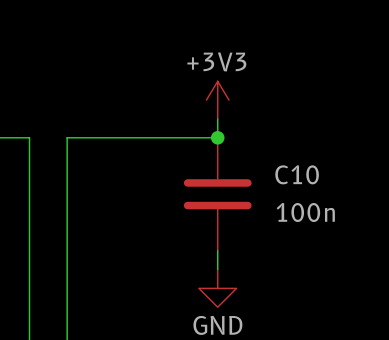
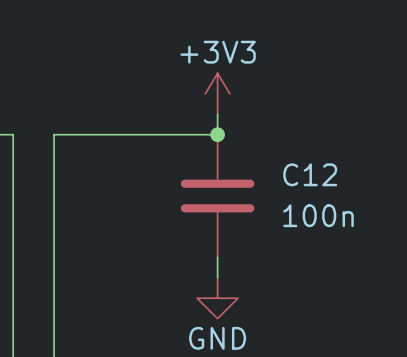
C10 name: C10 (297, 174) -> C12 (310, 174)

